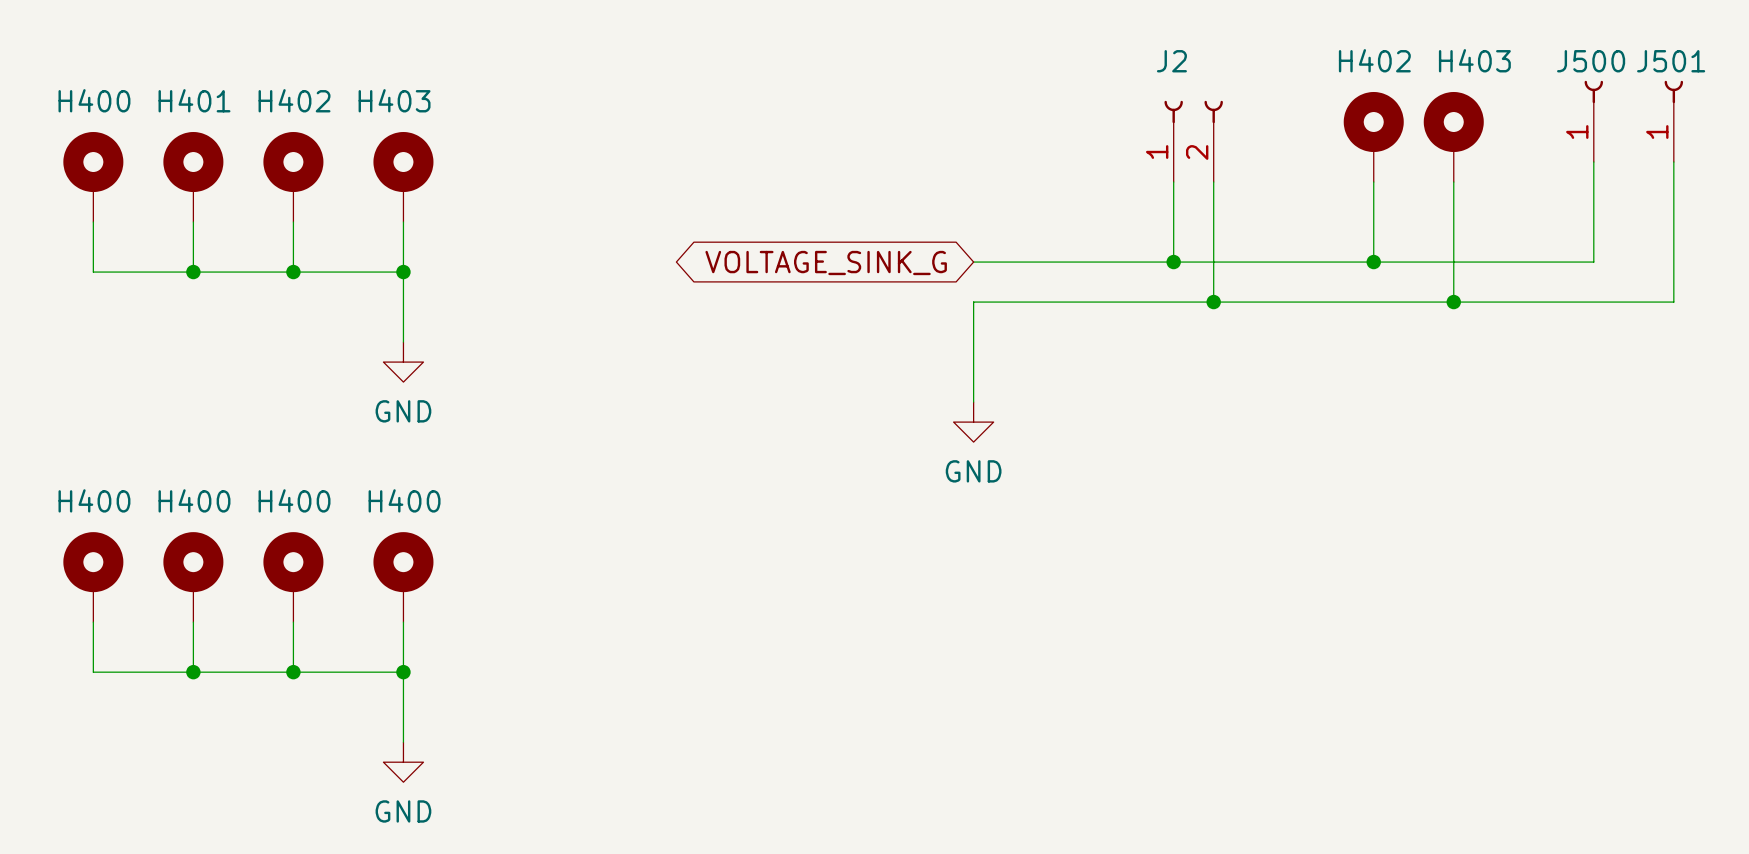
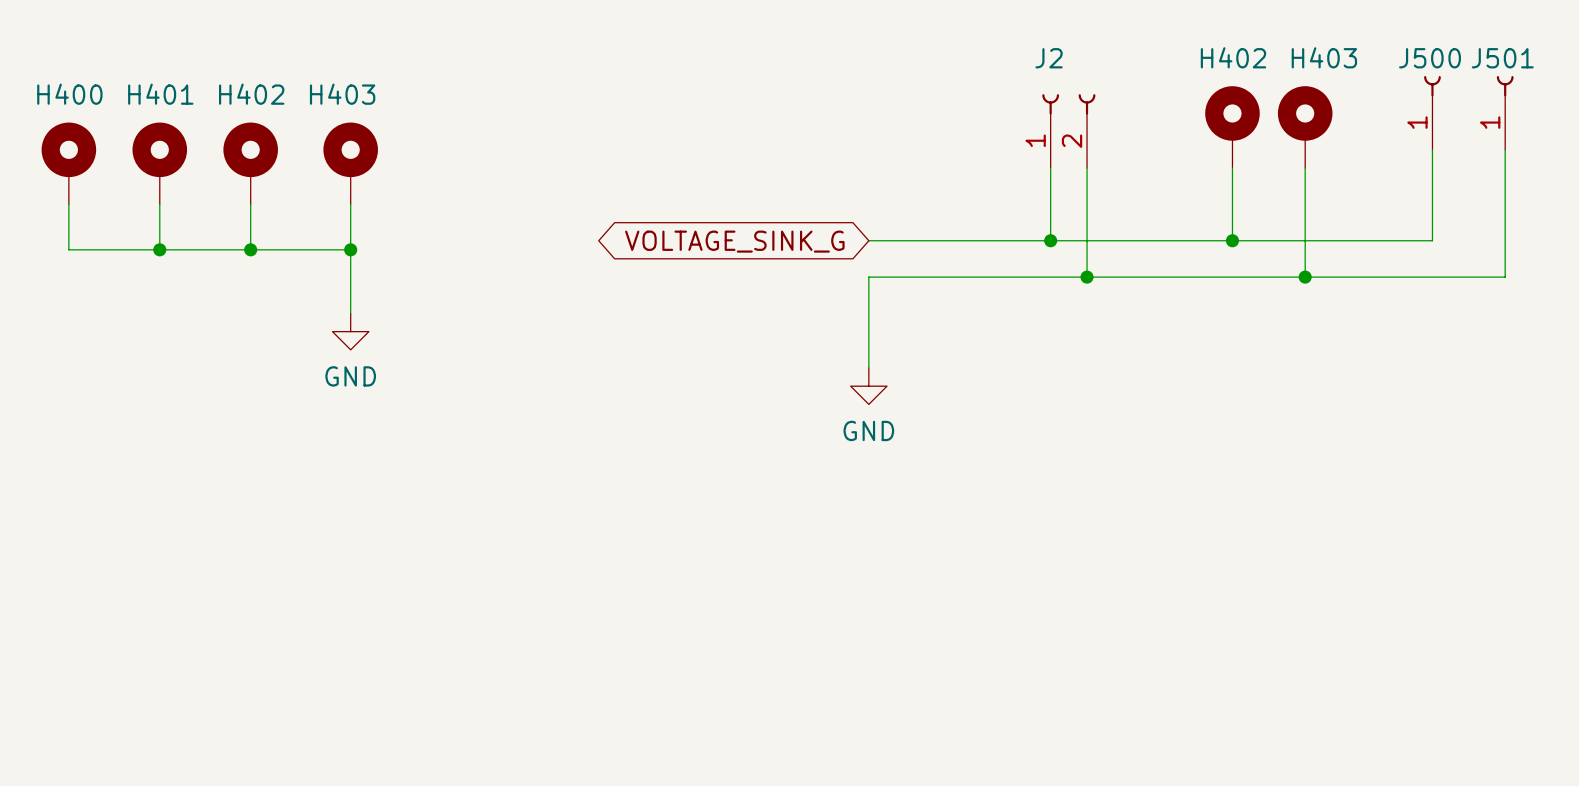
H400: (93, 577) -> none
H400: (193, 577) -> none
H400: (293, 577) -> none
H400: (403, 577) -> none
wire: (93, 622) (93, 672) (403, 672) -> none
wire: (193, 622) (193, 672) -> none
wire: (293, 622) (293, 672) -> none
wire: (403, 622) (403, 742) -> none
junction: (193, 672) -> none
junction: (293, 672) -> none
junction: (403, 672) -> none
power symbol: GND (403, 762) -> none

